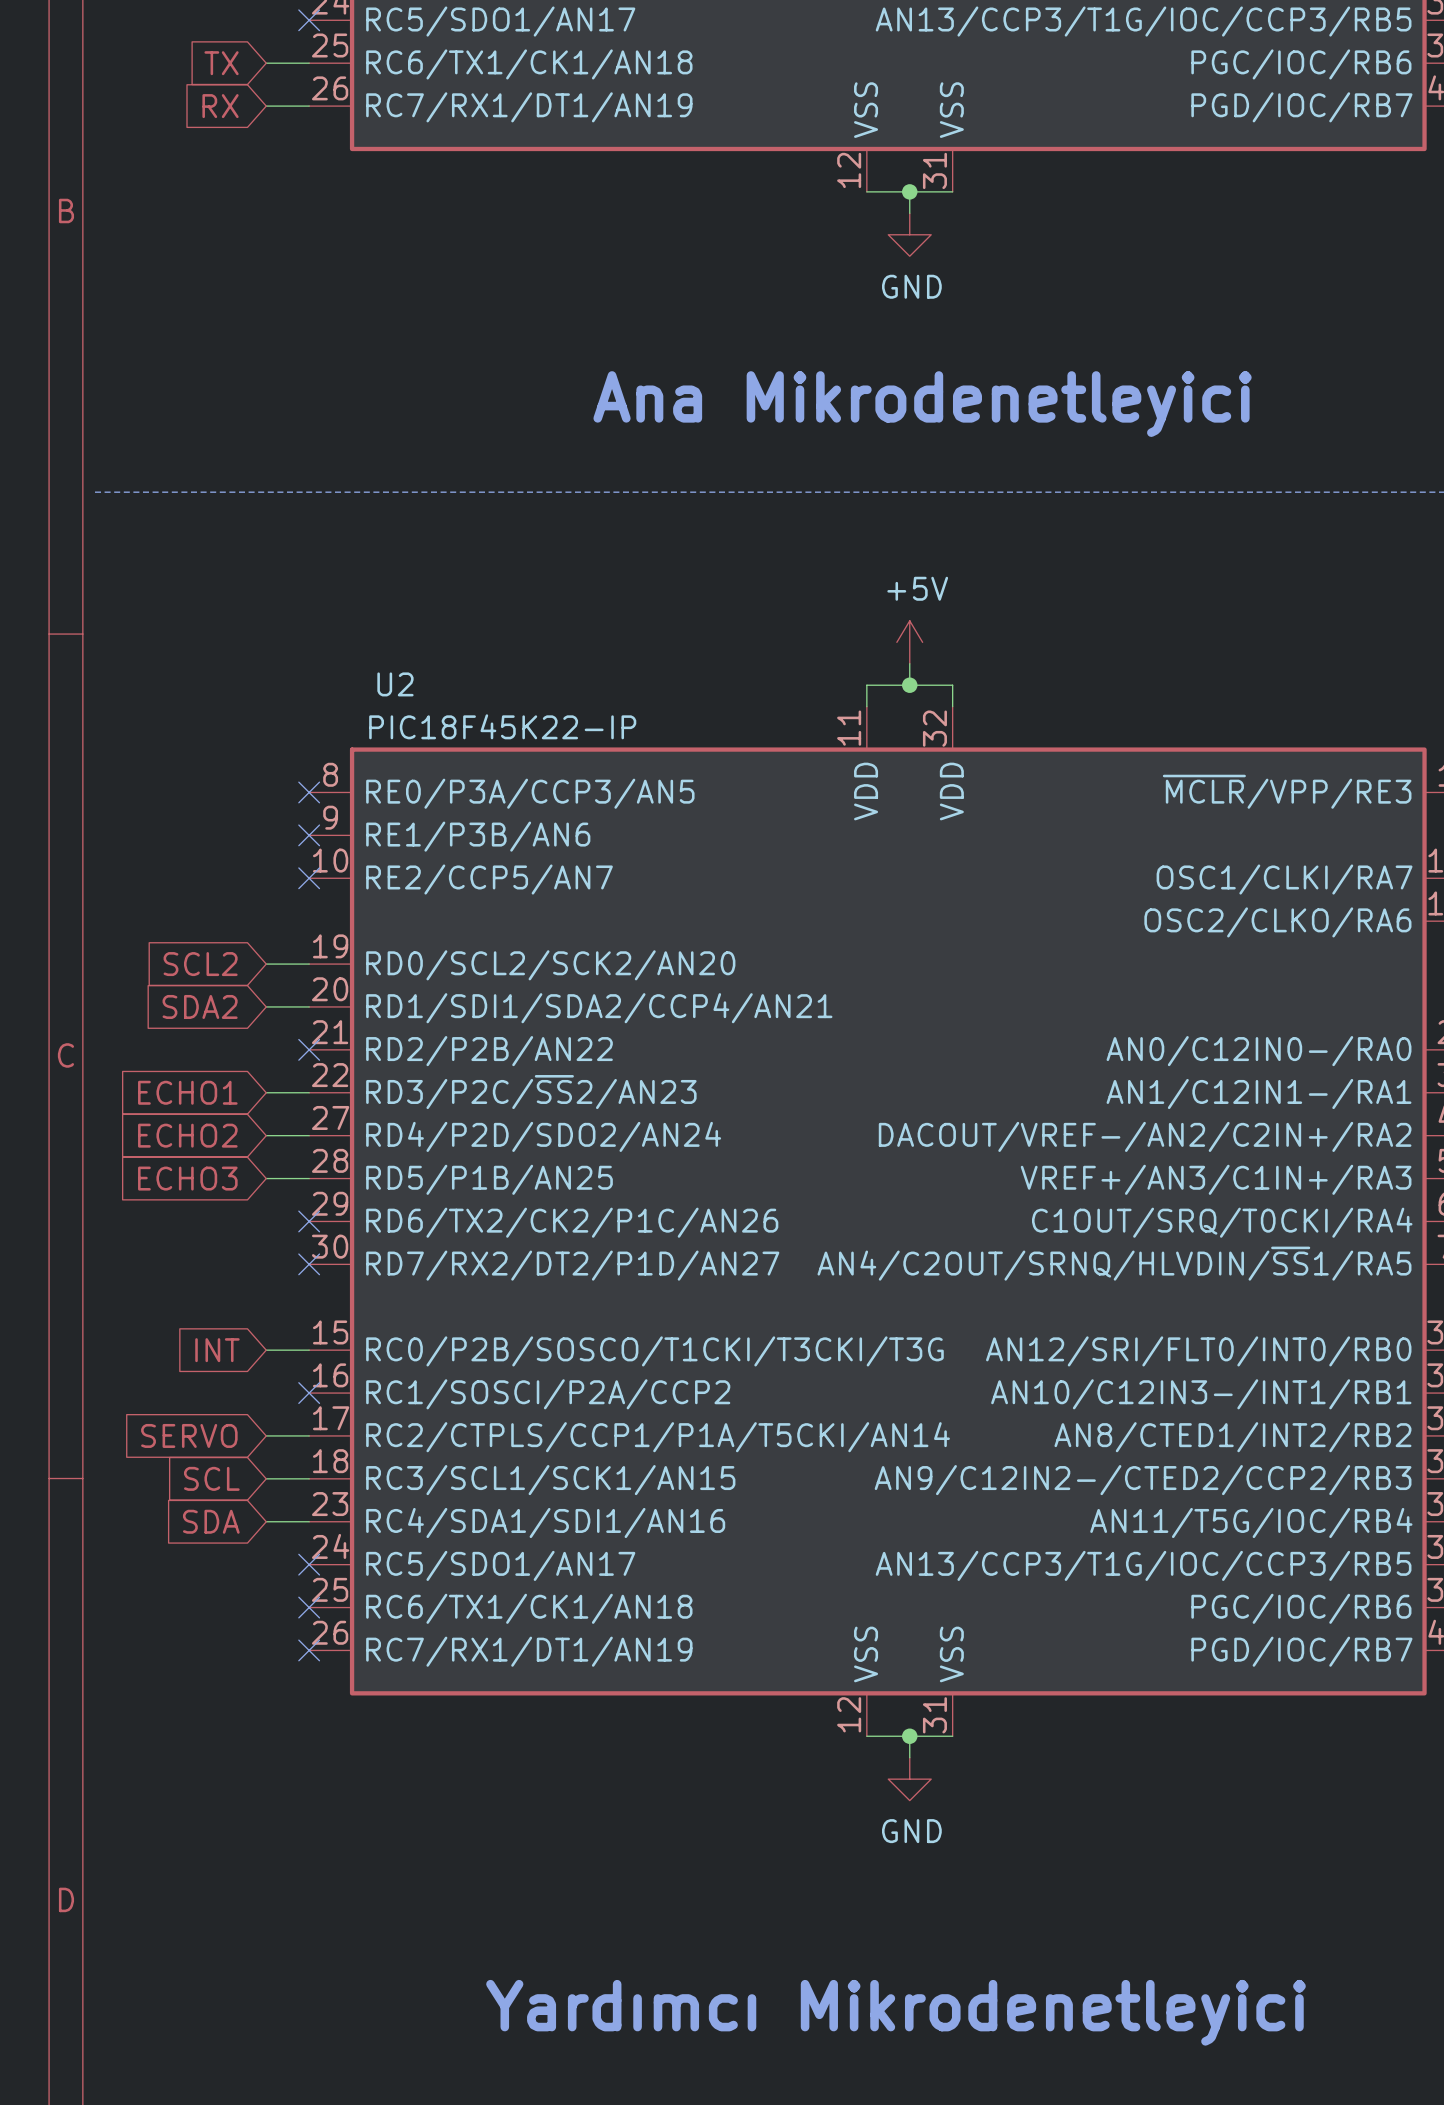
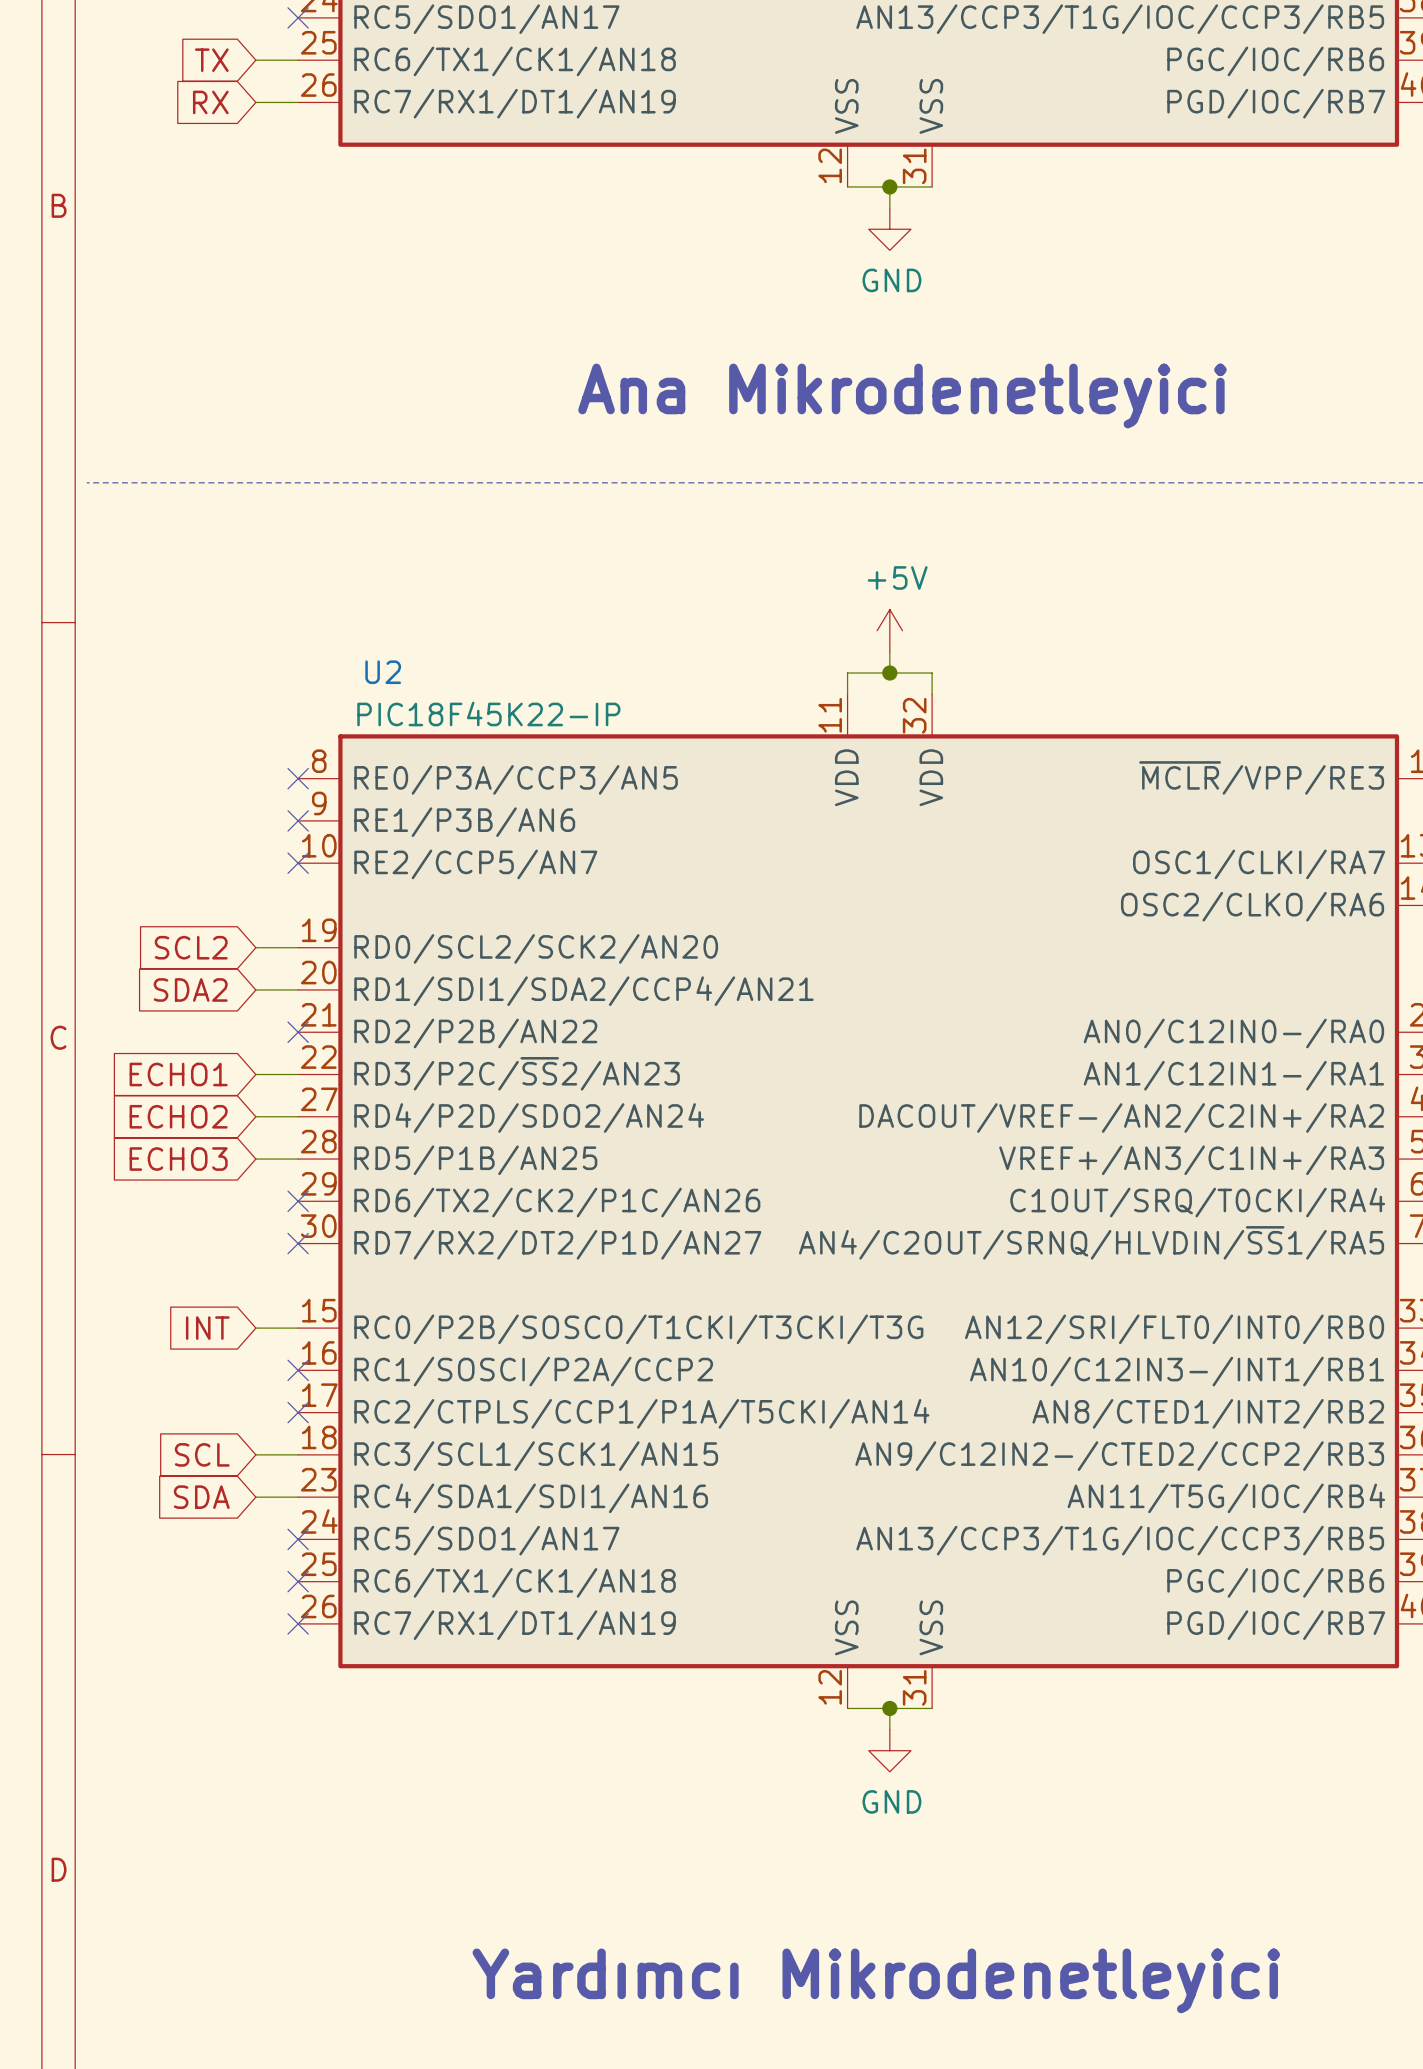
global label: SERVO (189, 1435) -> none
wire: (266, 1435) (309, 1435) -> none
no-connect mark: none -> (298, 1412)

